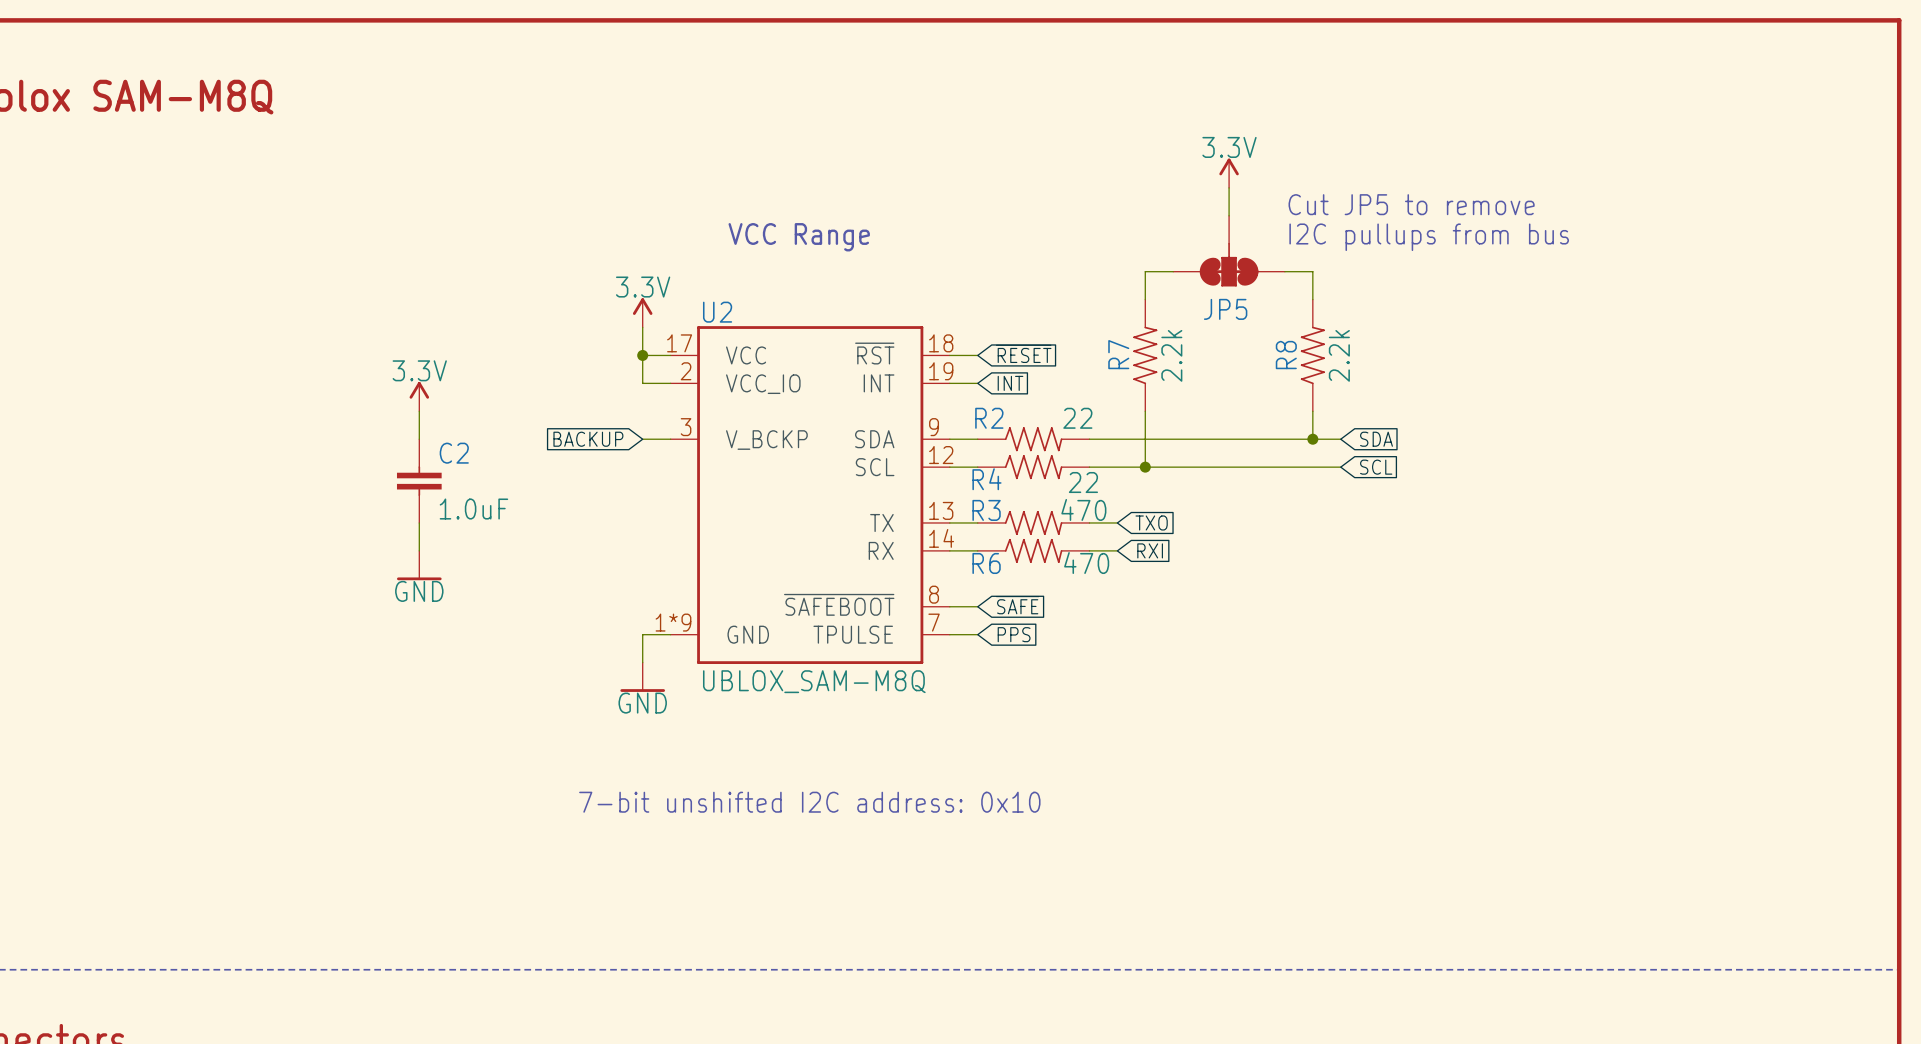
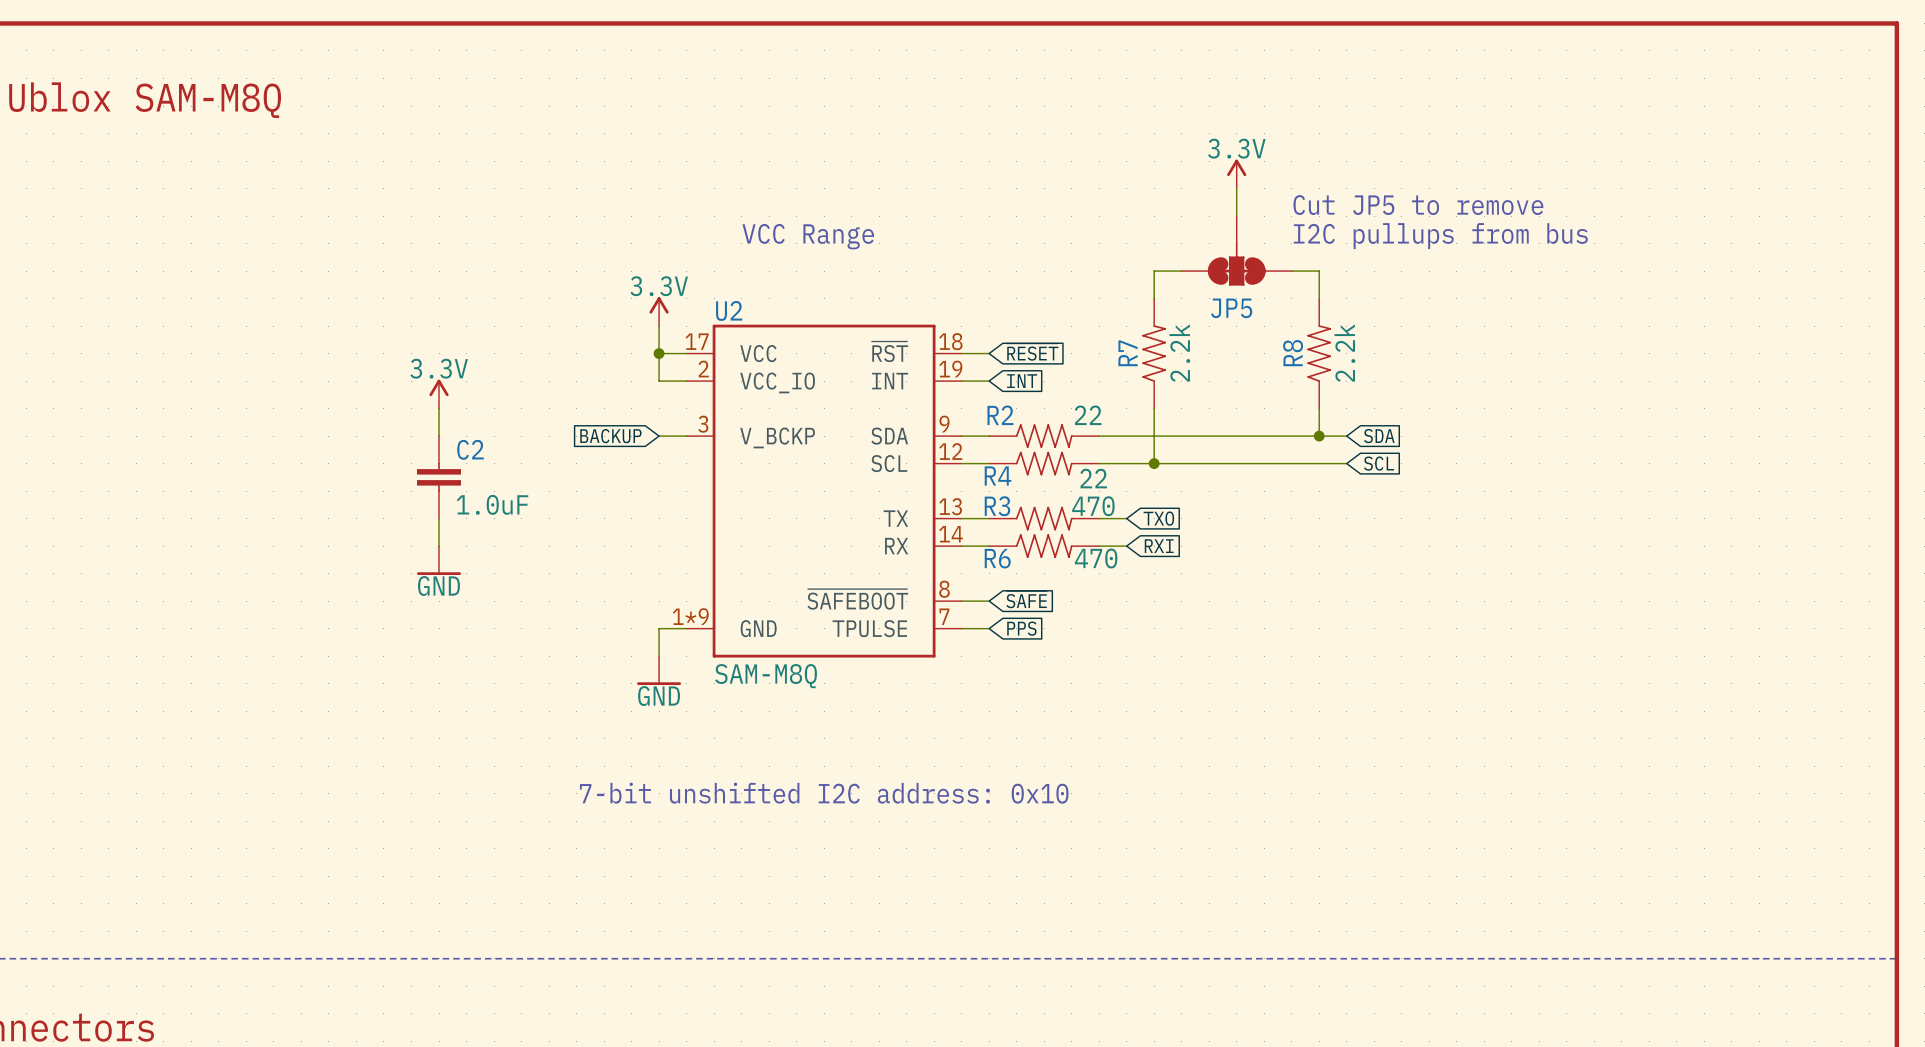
U2 value: UBLOX_SAM-M8Q (814, 681) -> SAM-M8Q (766, 676)

